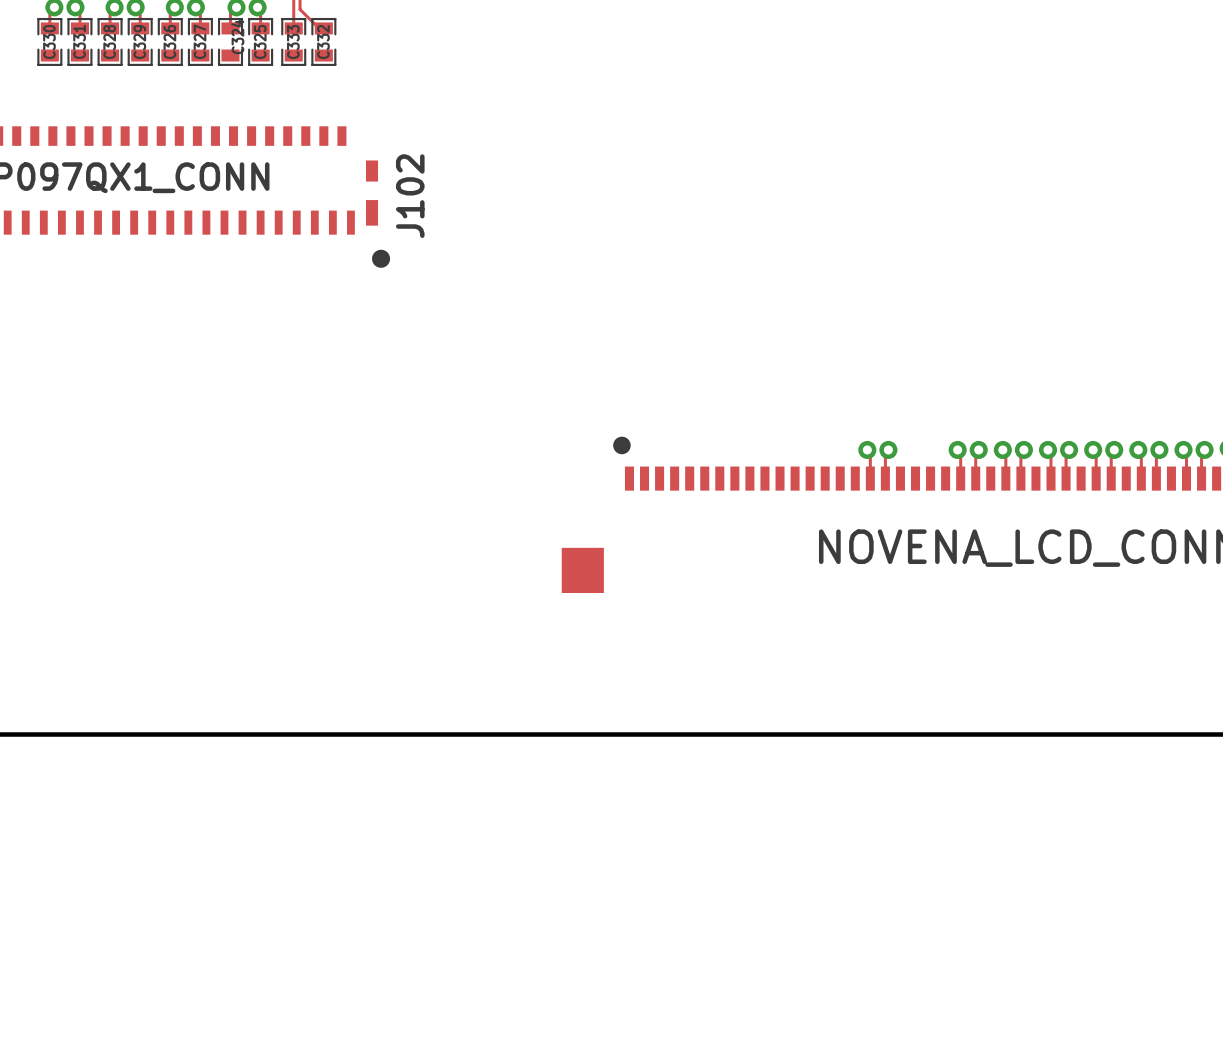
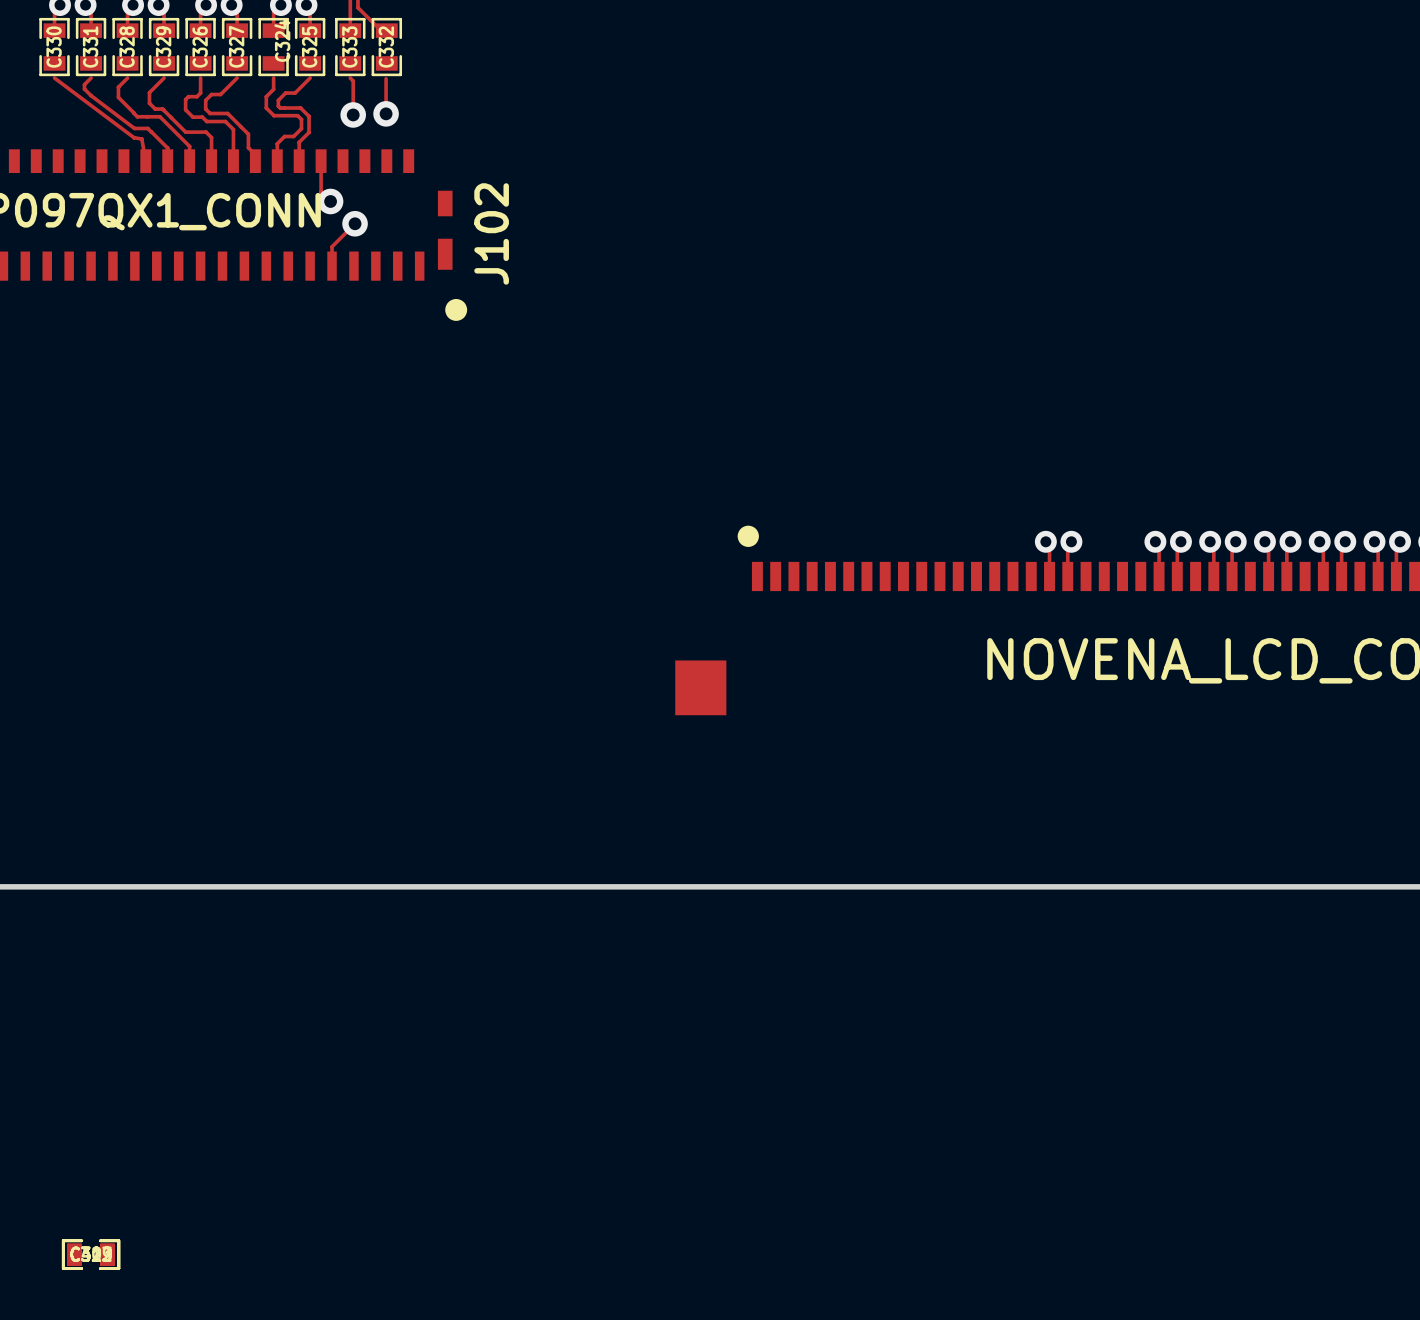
track: none -> (54, 78) (133, 137) (141, 139) (145, 161)
track: none -> (91, 78) (84, 84) (84, 89) (134, 128) (147, 128) (167, 148) (167, 161)
track: none -> (127, 78) (118, 87) (118, 97) (137, 116) (160, 116) (189, 146) (189, 161)
track: none -> (164, 78) (149, 92) (149, 103) (155, 109) (162, 109) (185, 132) (206, 132) (211, 137) (211, 161)
track: none -> (200, 78) (200, 93) (196, 96) (188, 96) (185, 99) (185, 109) (192, 117) (202, 117) (206, 121) (225, 121) (233, 129) (233, 161)
track: none -> (237, 78) (220, 94) (211, 94) (205, 100) (205, 109) (210, 113) (227, 113) (248, 134) (248, 147) (255, 154) (255, 161)
track: none -> (273, 78) (273, 89) (266, 96) (266, 108) (273, 115) (297, 115) (301, 119) (301, 128) (293, 136) (284, 136) (277, 143) (277, 161)
track: none -> (310, 78) (295, 93) (285, 93) (278, 100) (280, 108) (300, 108) (309, 116) (309, 132) (299, 142) (299, 161)
track: none -> (350, 78) (353, 80) (353, 114)
track: none -> (386, 78) (386, 113)
via: none -> (353, 114)
via: none -> (386, 113)
track: none -> (321, 161) (321, 192) (330, 201)
via: none -> (330, 201)
track: none -> (355, 223) (332, 246) (332, 266)
via: none -> (355, 223)
part: none -> (91, 1254)
part: none -> (91, 1254)
part: none -> (91, 1254)

